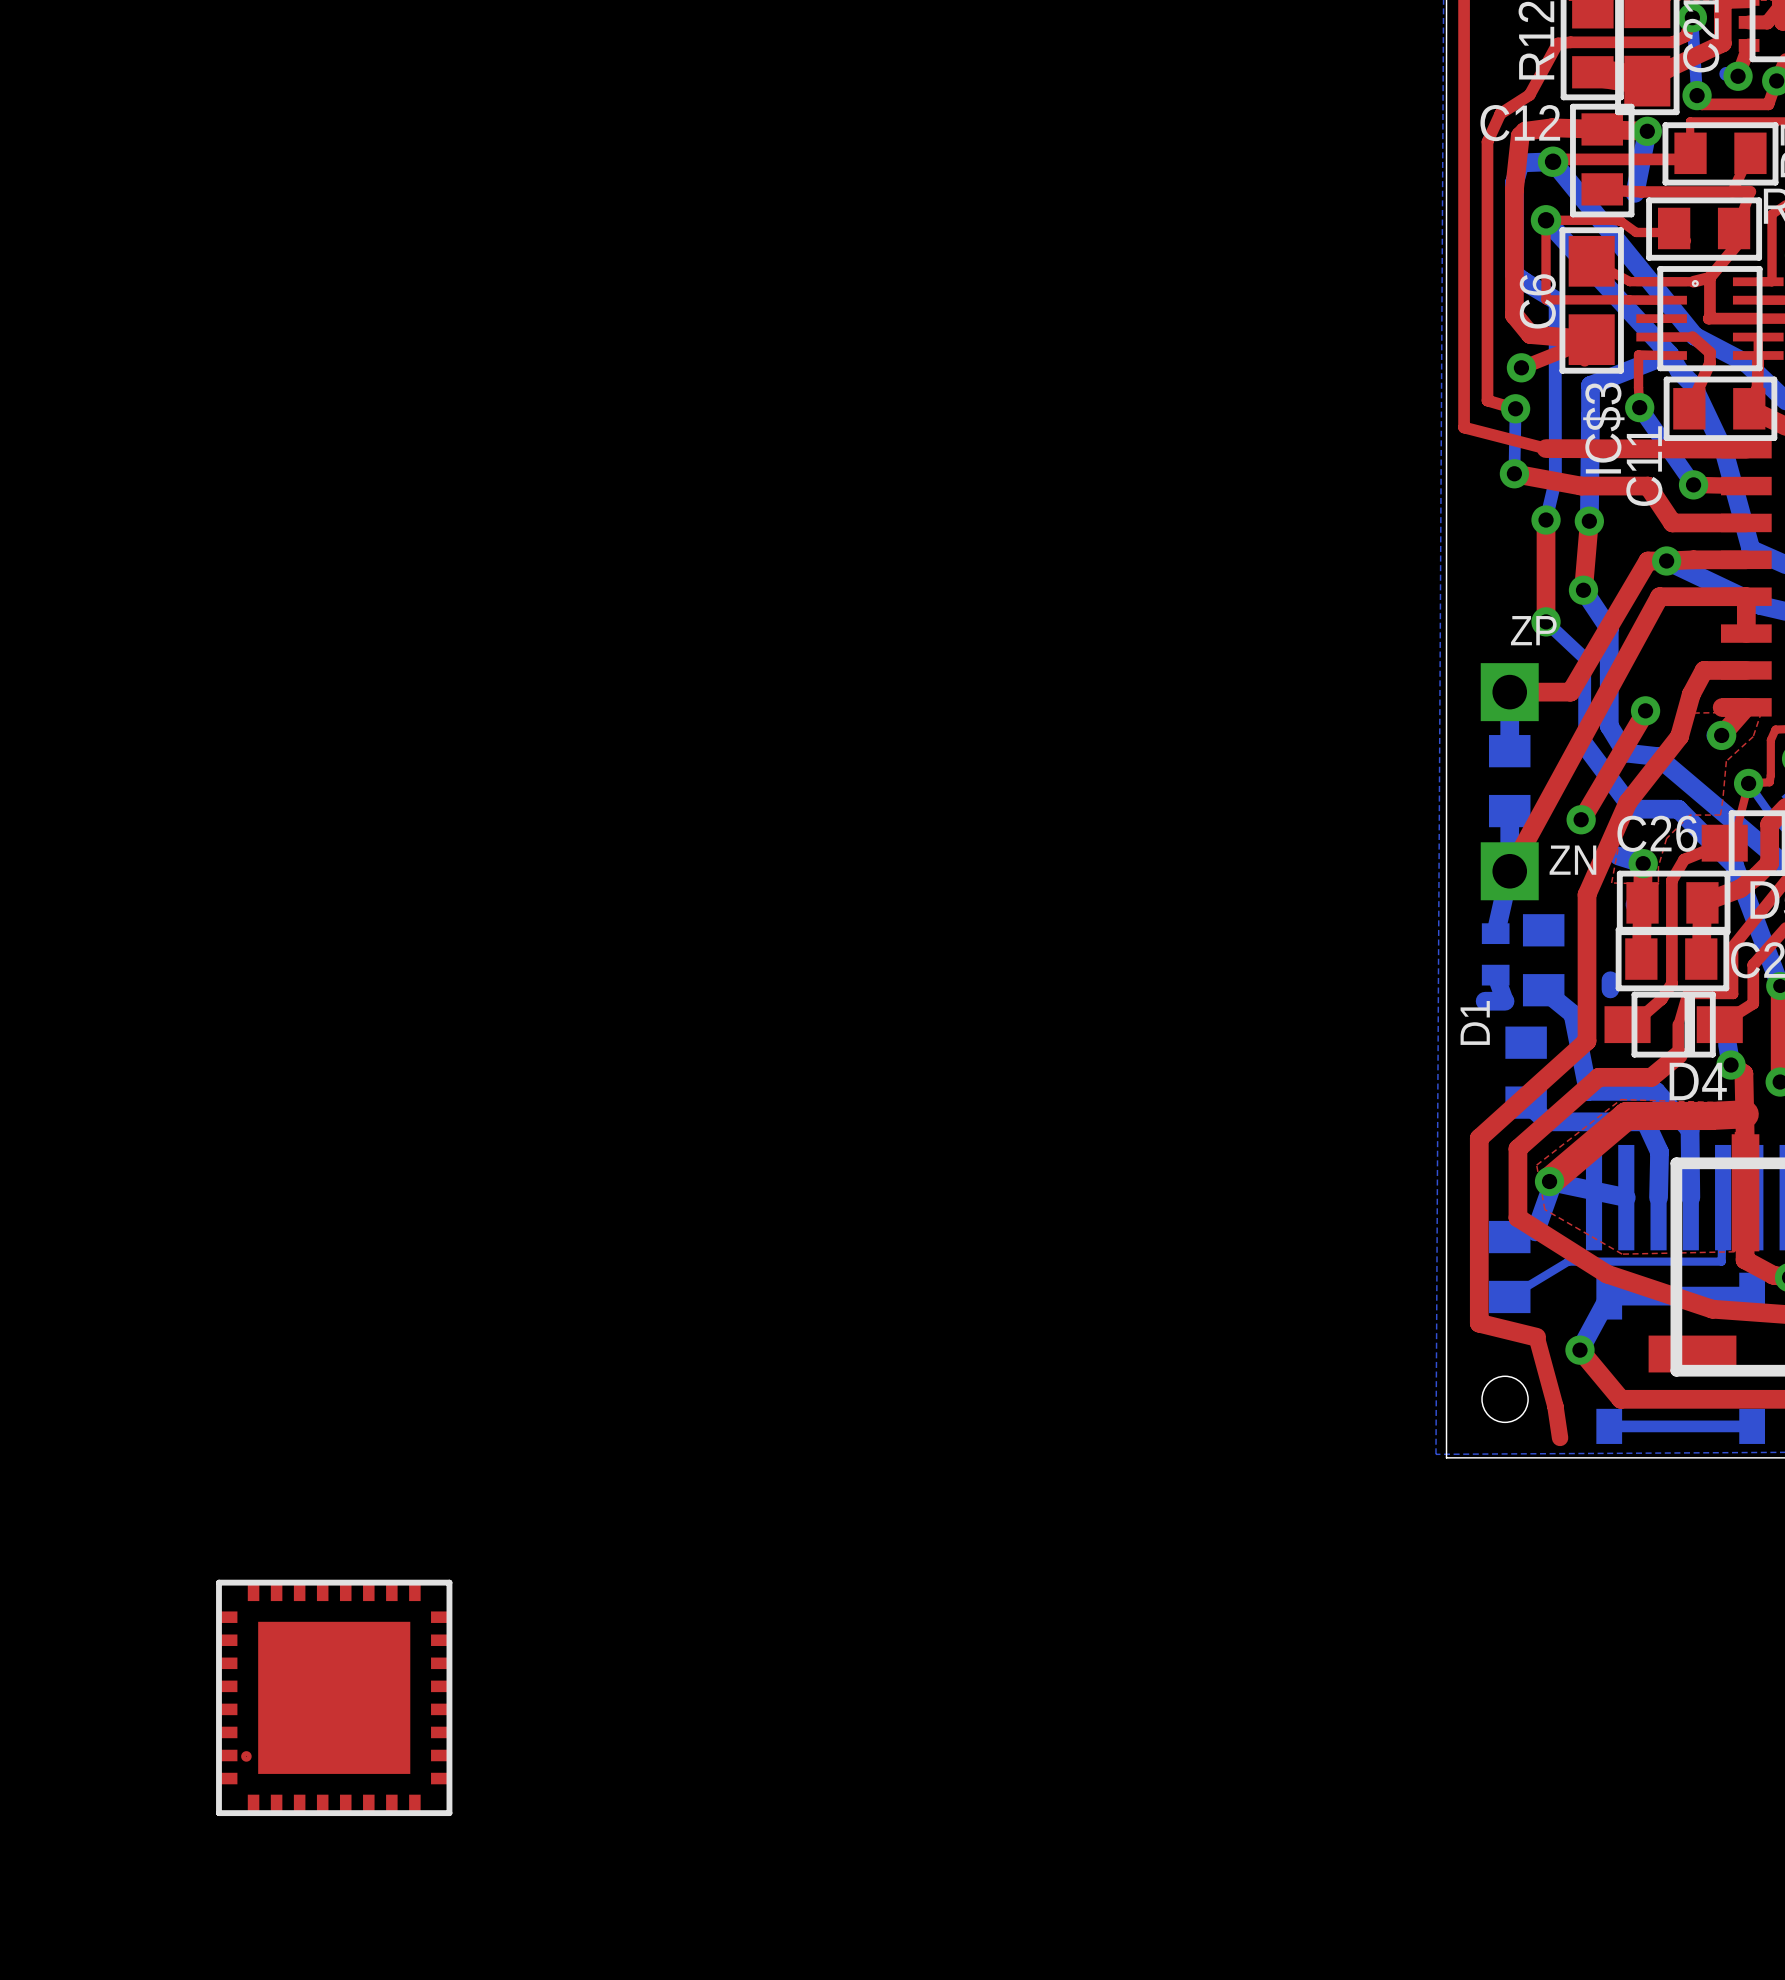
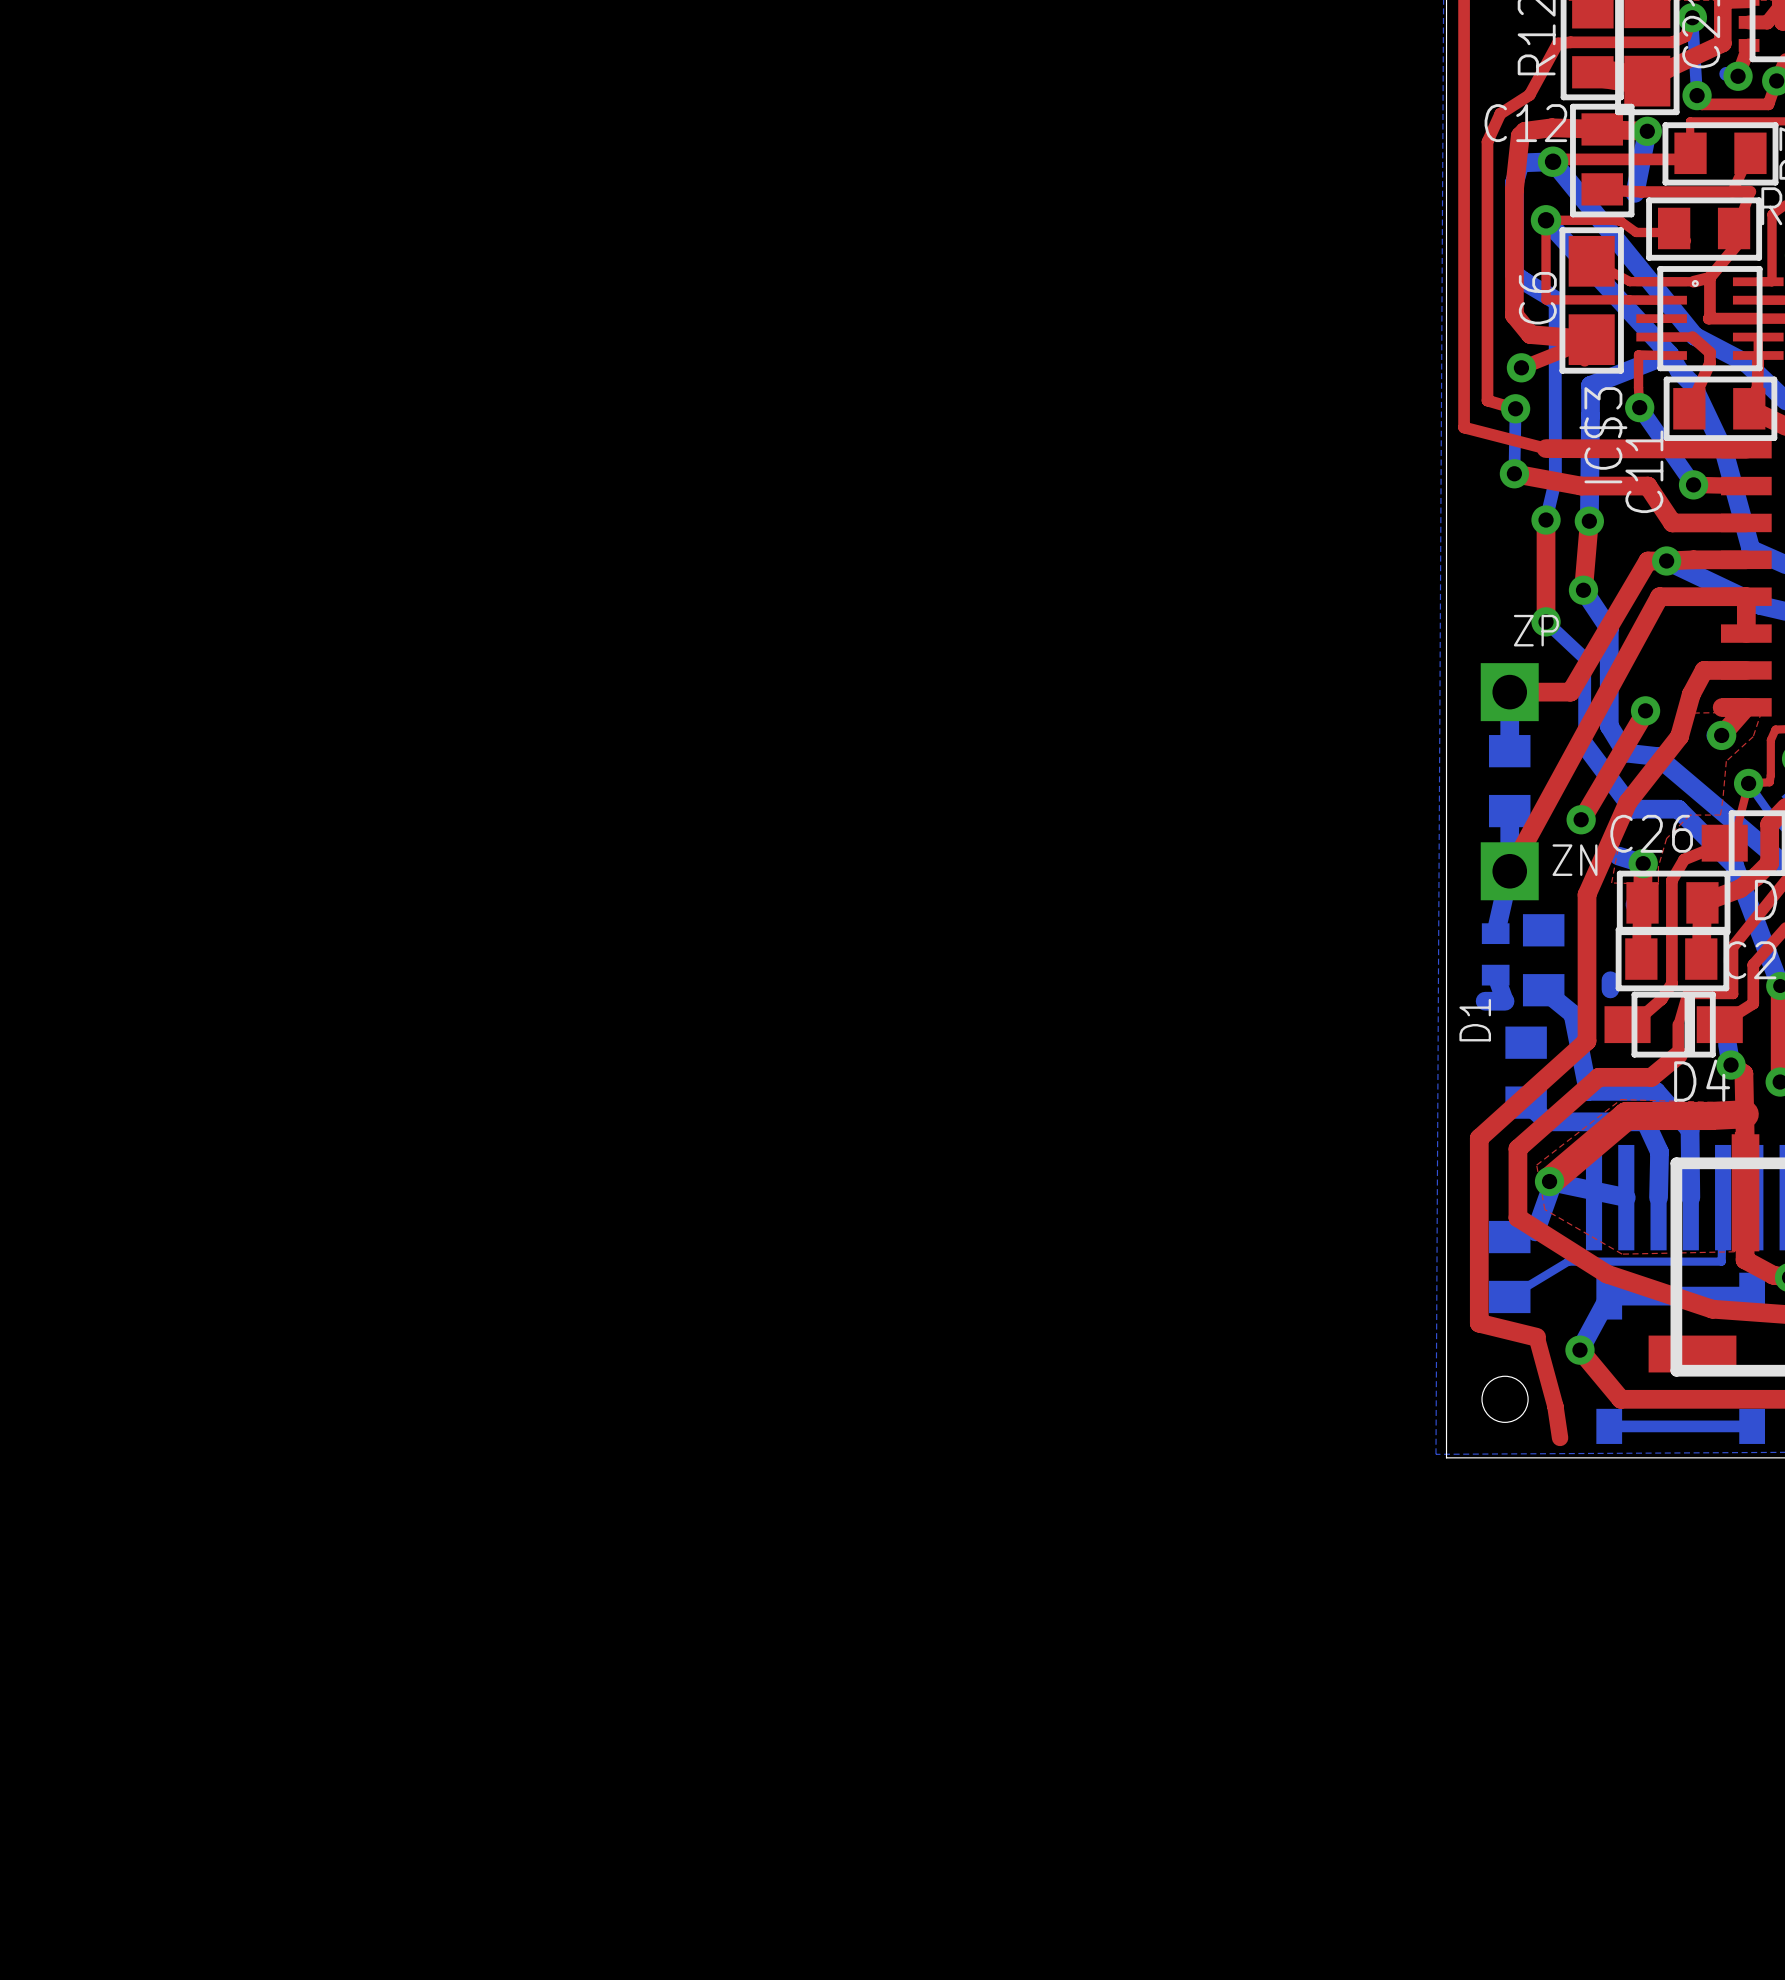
part: (334, 1697) -> none

